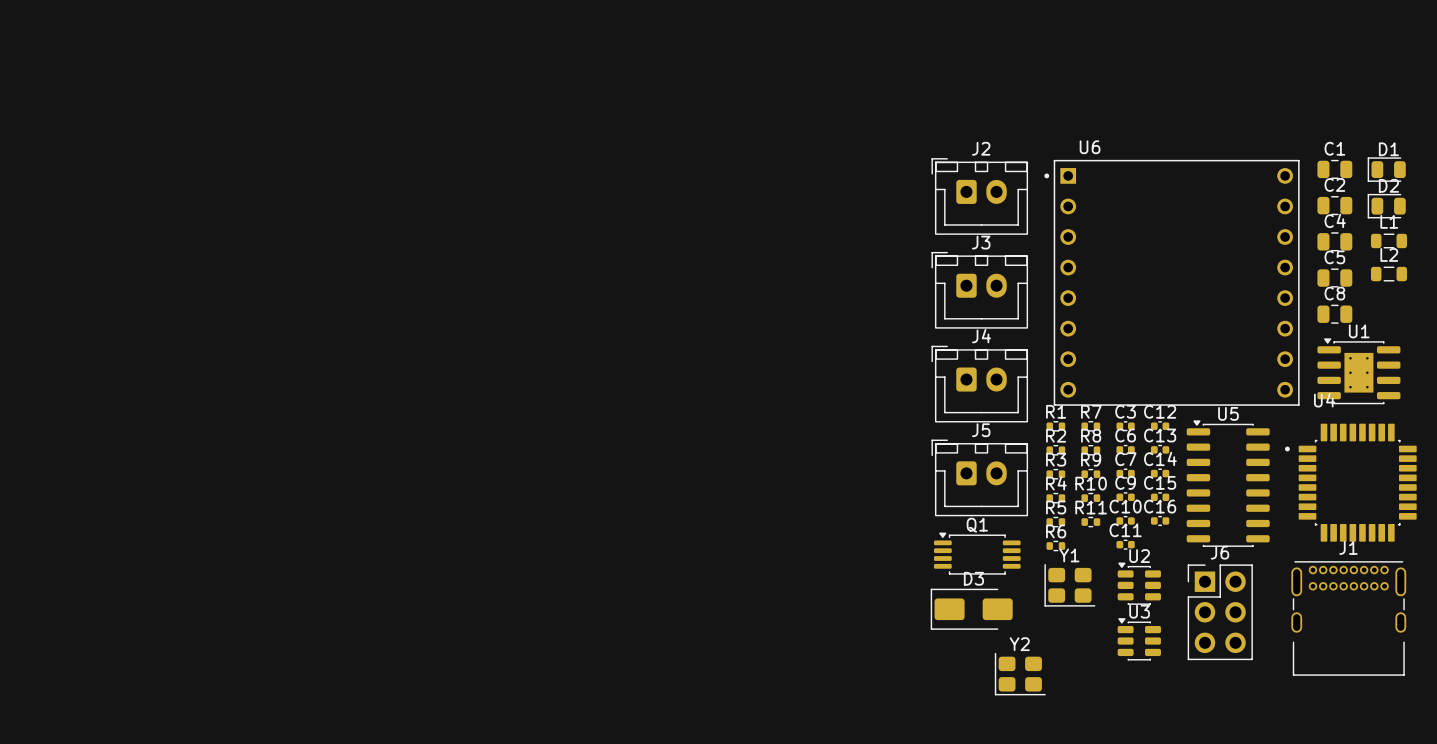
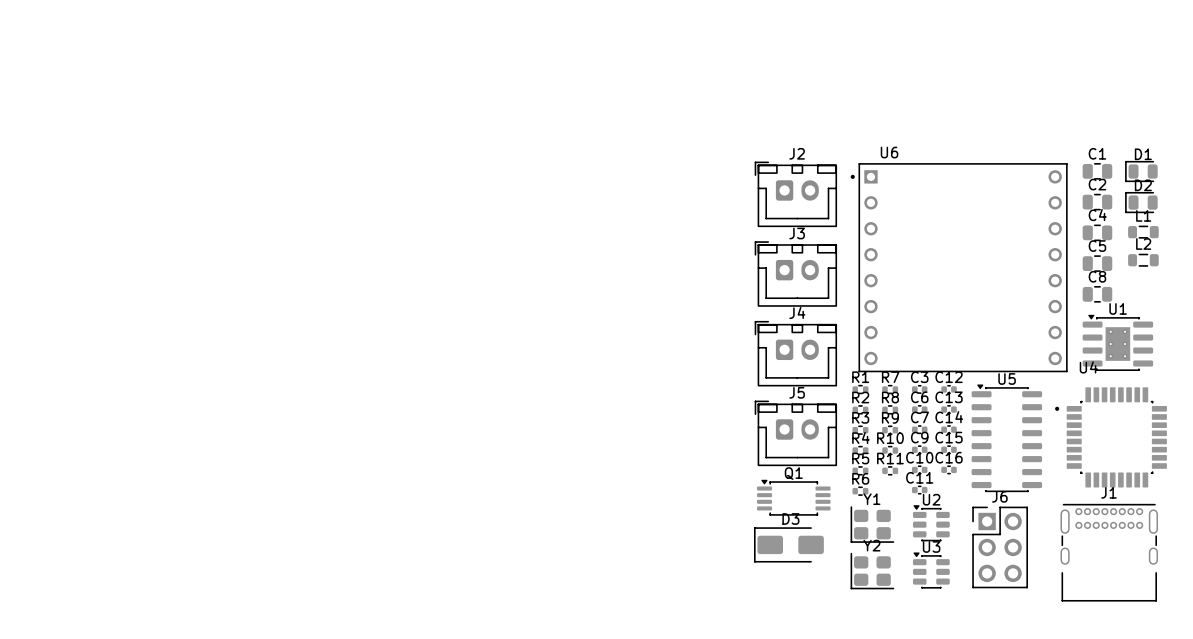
Y2 position: (1020, 674) -> (872, 571)

